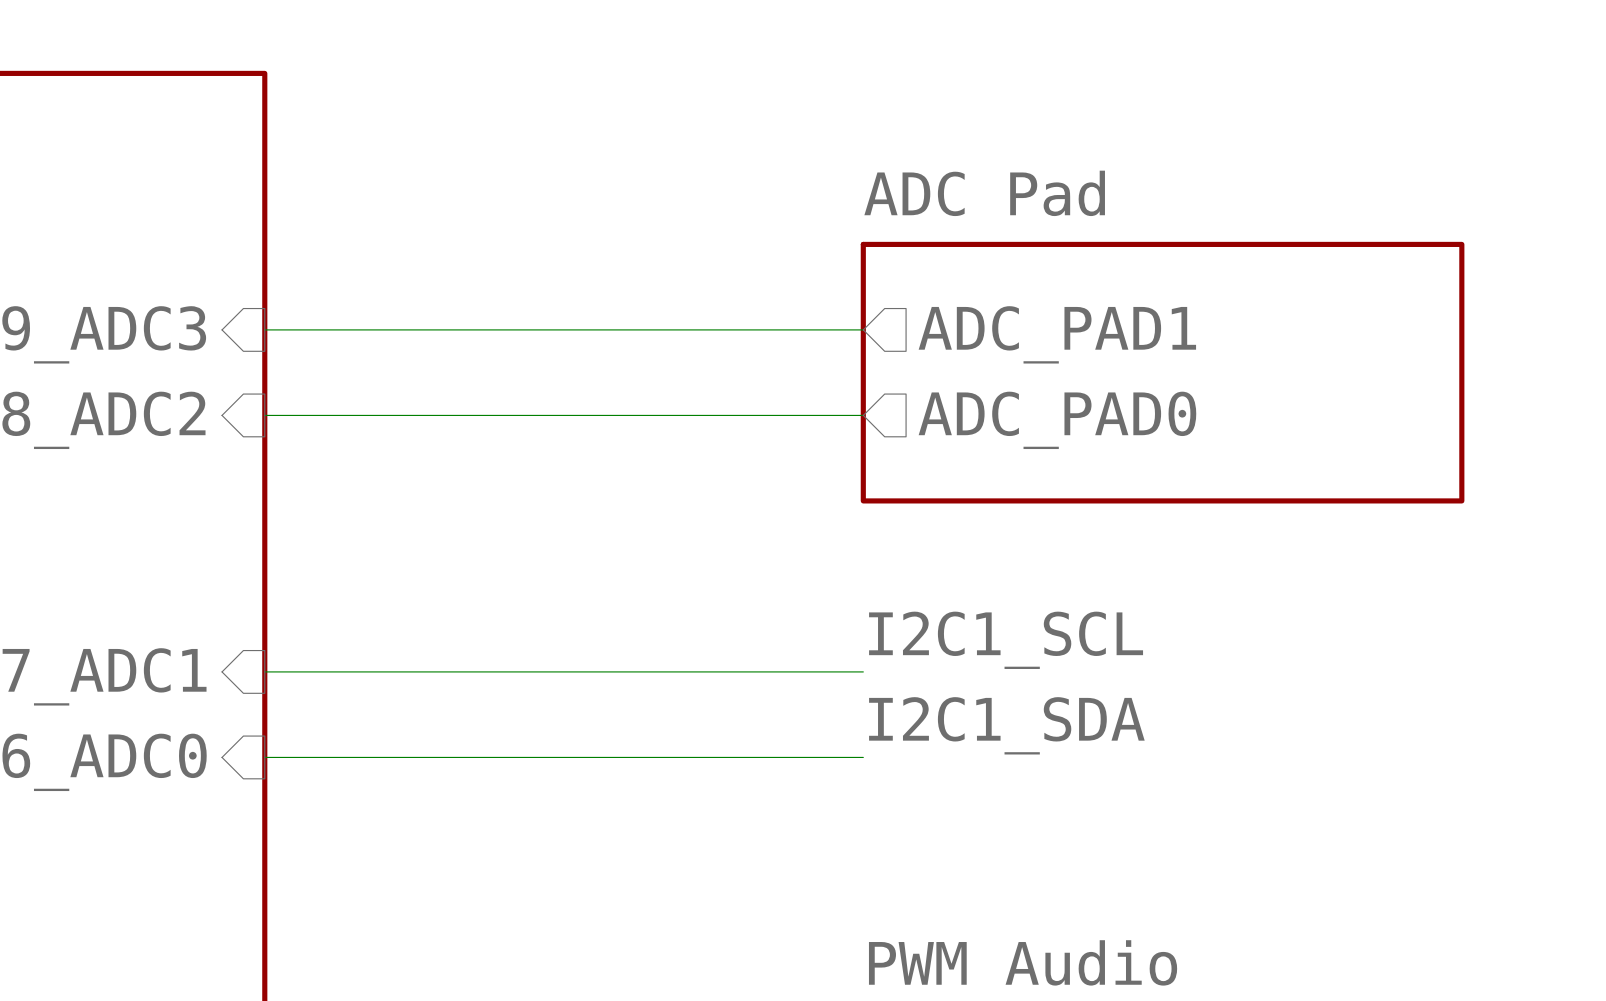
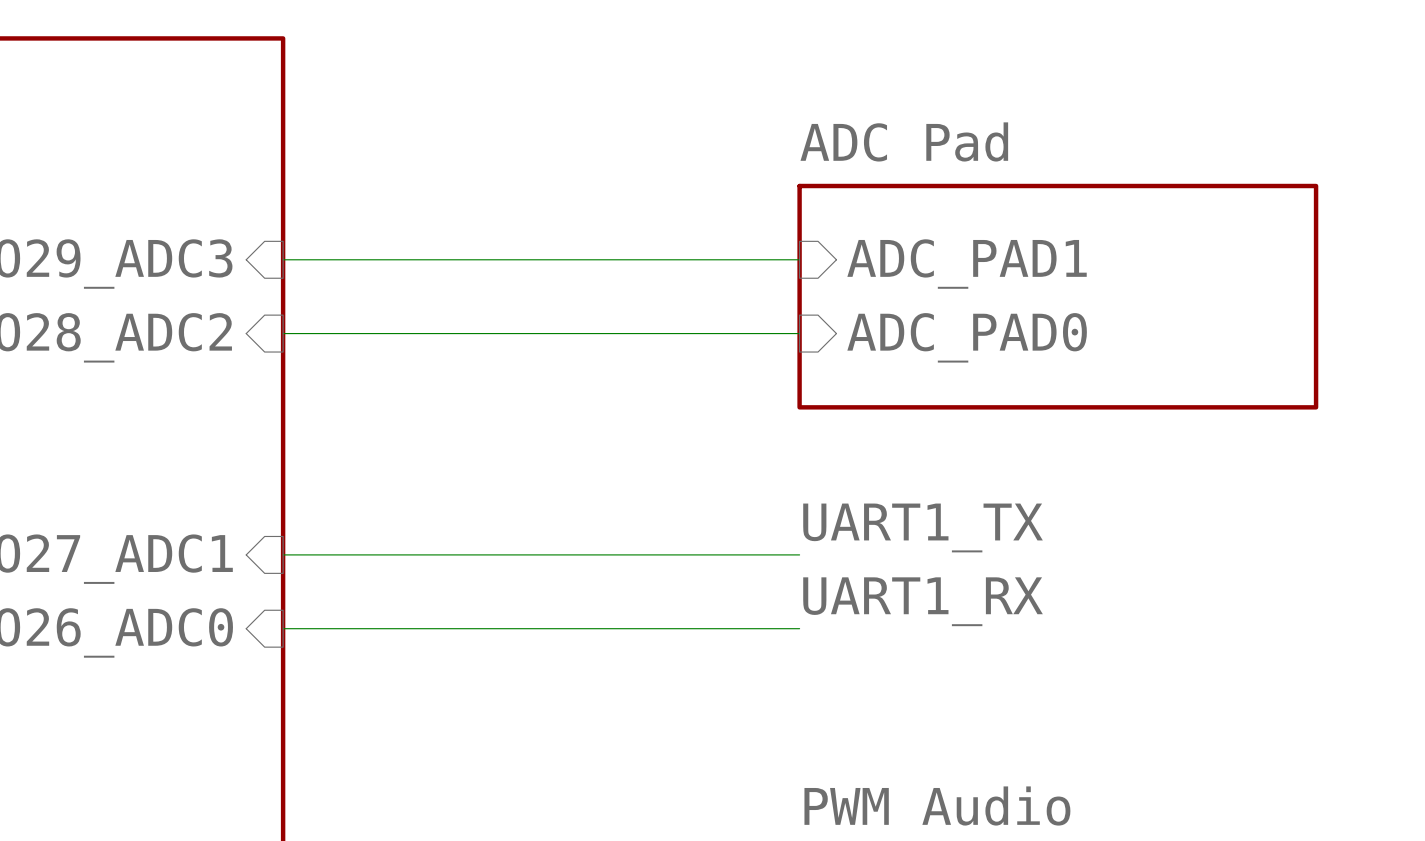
sheet pin shape: output (1057, 334) -> input (967, 264)
sheet pin shape: output (1057, 420) -> input (967, 337)
label: I2C1_SCL (1006, 640) -> UART1_TX (923, 527)
label: I2C1_SDA (1006, 725) -> UART1_RX (923, 601)

